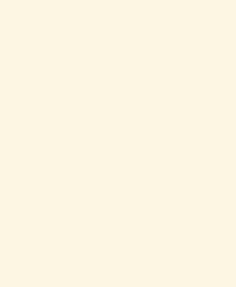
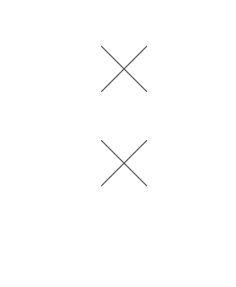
no-connect mark: none -> (124, 68)
no-connect mark: none -> (124, 163)

